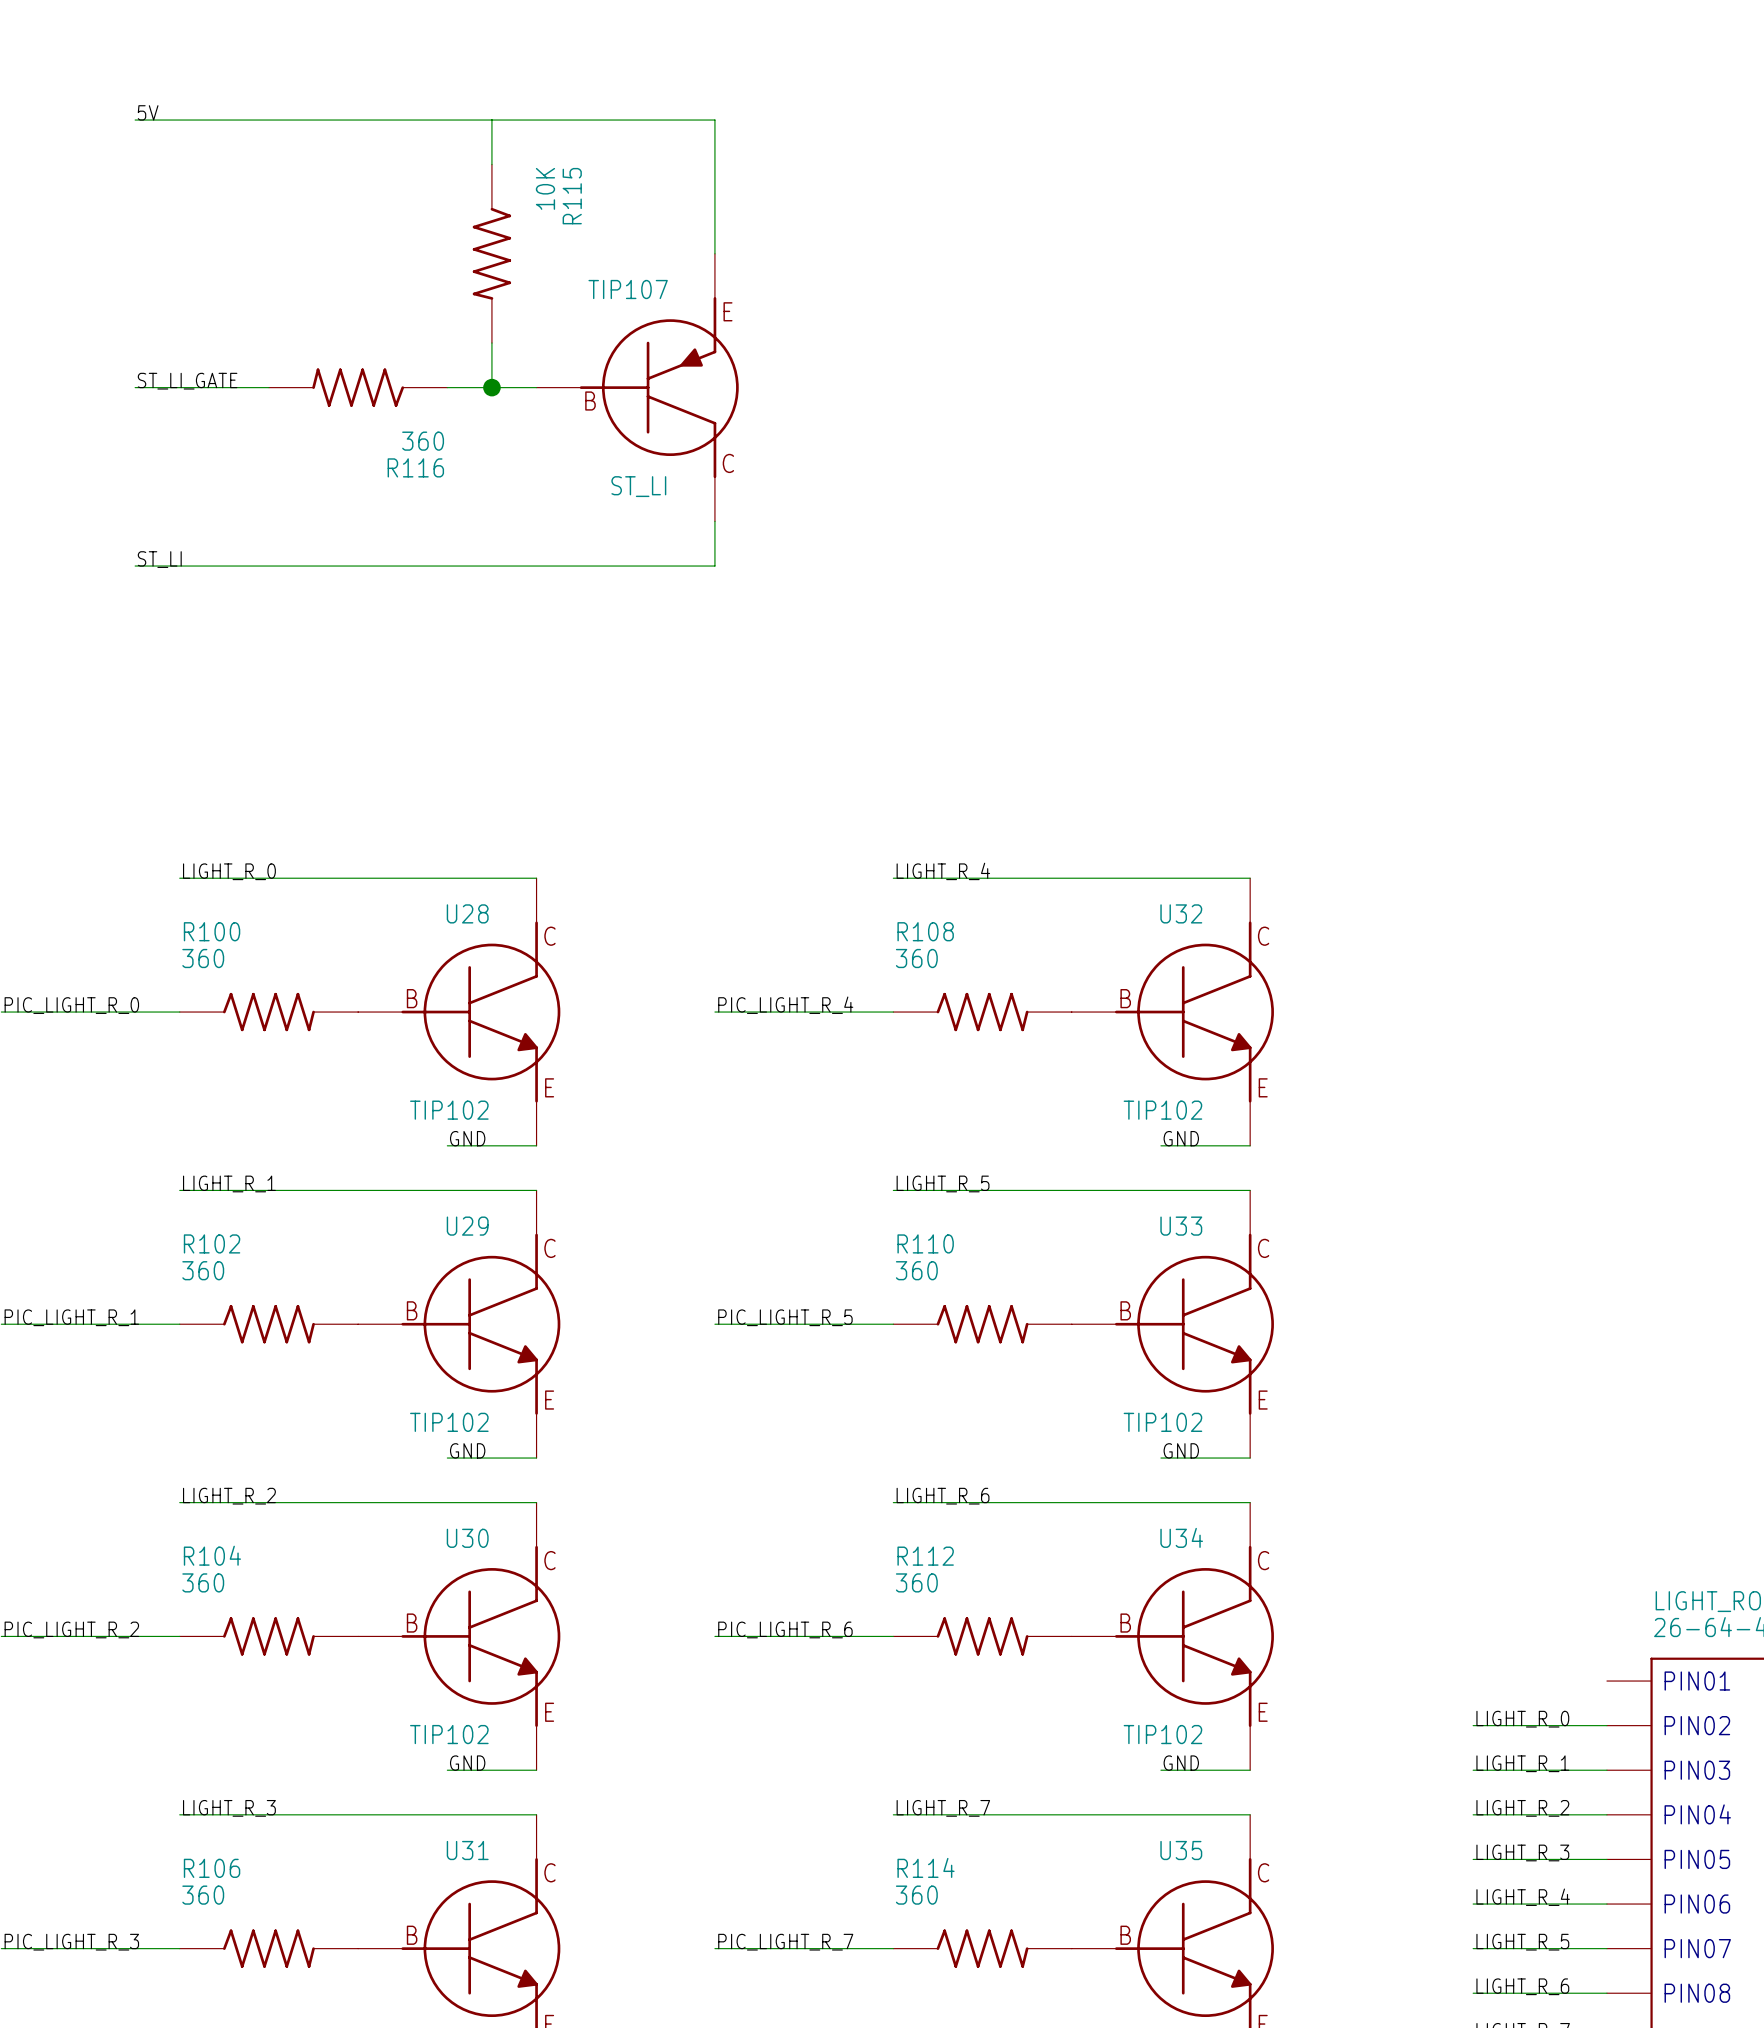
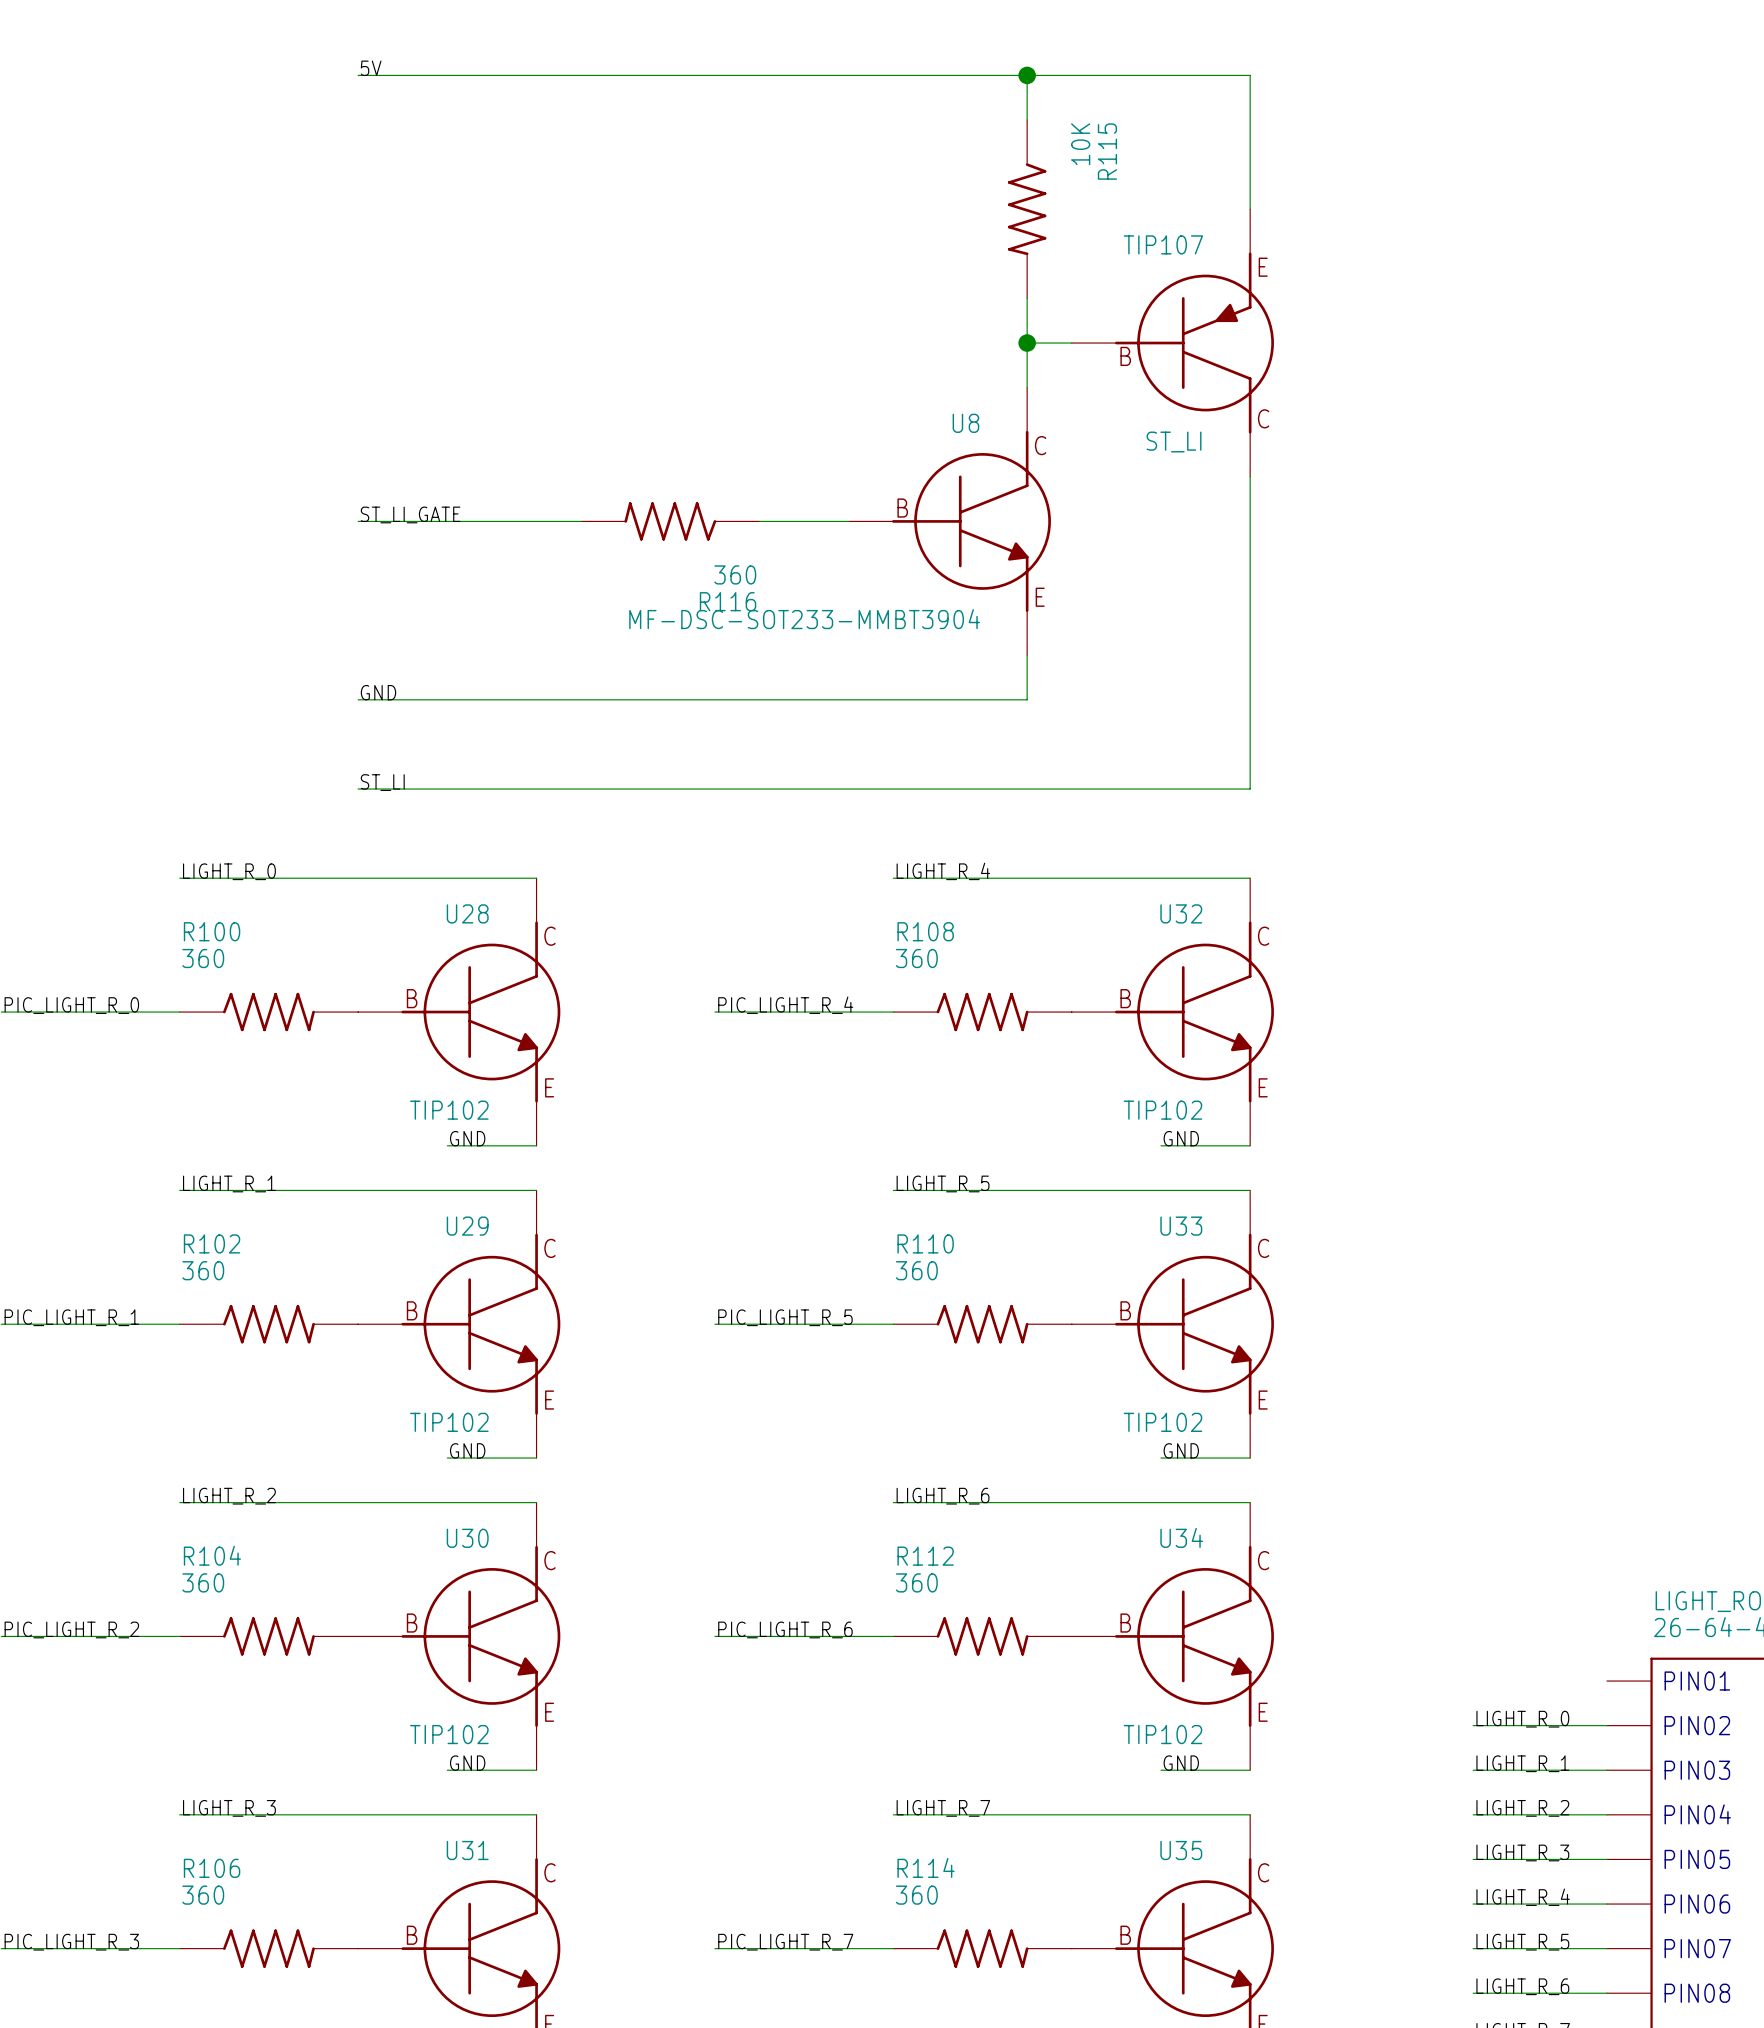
wire: none -> (358, 75) (1250, 75) (1250, 209)
wire: none -> (1027, 75) (1027, 120)
junction: none -> (1027, 75)
label position: 5V (148, 112) -> 5V (371, 68)
wire: (135, 120) (714, 120) (714, 253) -> none
wire: (491, 120) (491, 164) -> none
R115 position: (491, 253) -> (1027, 209)
wire: none -> (1027, 298) (1027, 387)
wire: (491, 343) (491, 387) -> none
wire: none -> (1027, 343) (1071, 343)
junction: none -> (1027, 343)
ST_LI: none -> TIP107 (1172, 343)
label position: ST_LI_GATE (187, 381) -> ST_LI_GATE (410, 514)
wire: (135, 387) (268, 387) -> none
R116 position: (358, 387) -> (670, 521)
wire: (447, 387) (536, 387) -> (759, 521) (848, 521)
junction: (491, 387) -> none
ST_LI: TIP107 (637, 387) -> none
wire: none -> (1250, 476) (1250, 789) (358, 789)
wire: none -> (358, 521) (581, 521)
wire: (714, 521) (714, 566) (135, 566) -> none
U8: none -> MF-DSC-SOT233-MMBT3904 (949, 521)
label position: ST_LI (159, 559) -> ST_LI (382, 782)
wire: none -> (1027, 655) (1027, 699) (358, 699)
label: none -> GND (378, 692)

